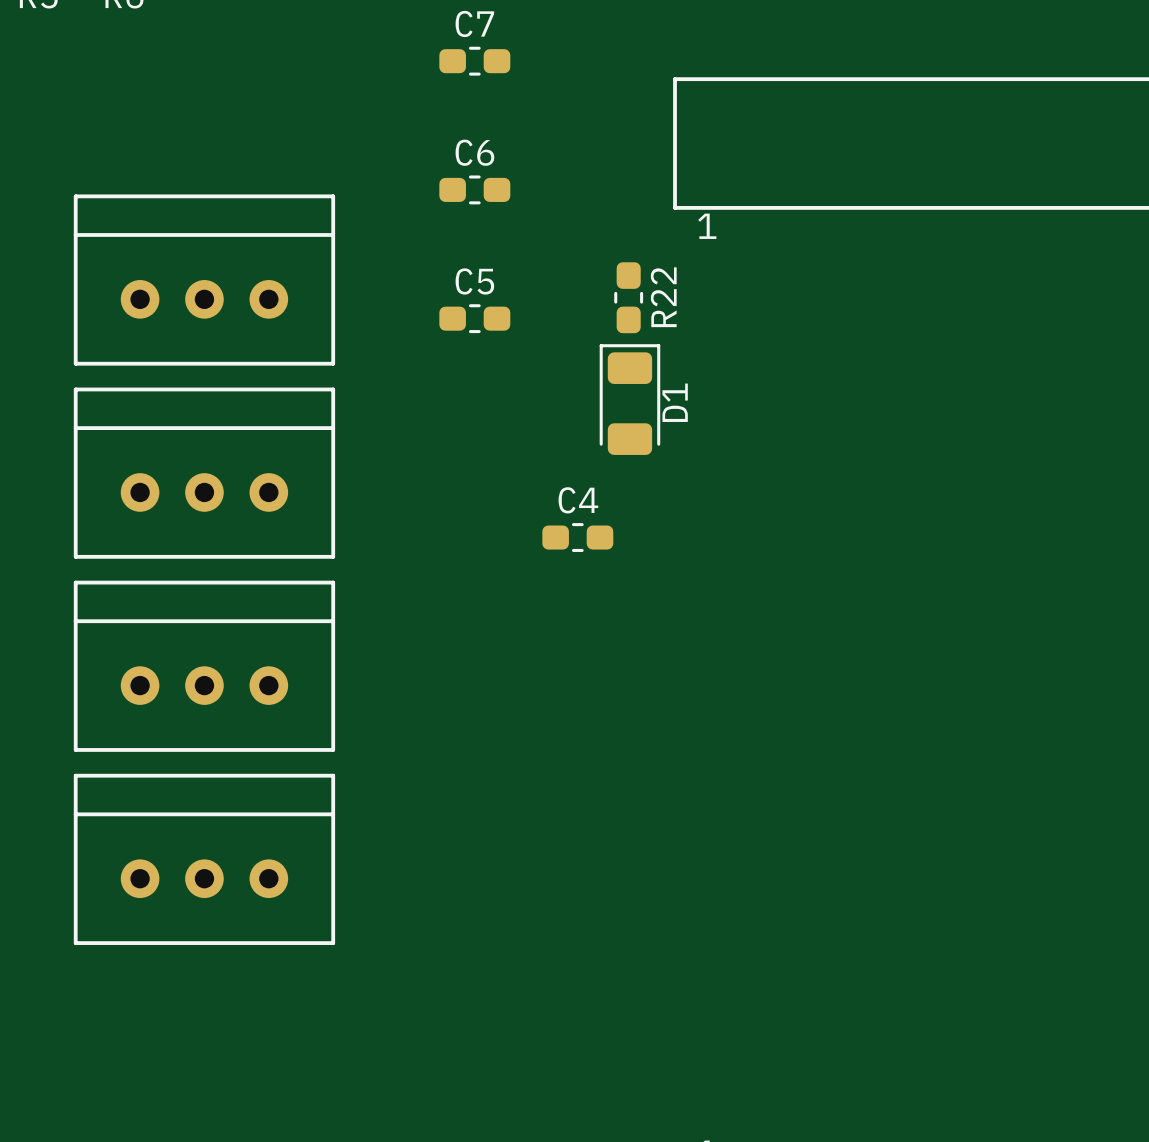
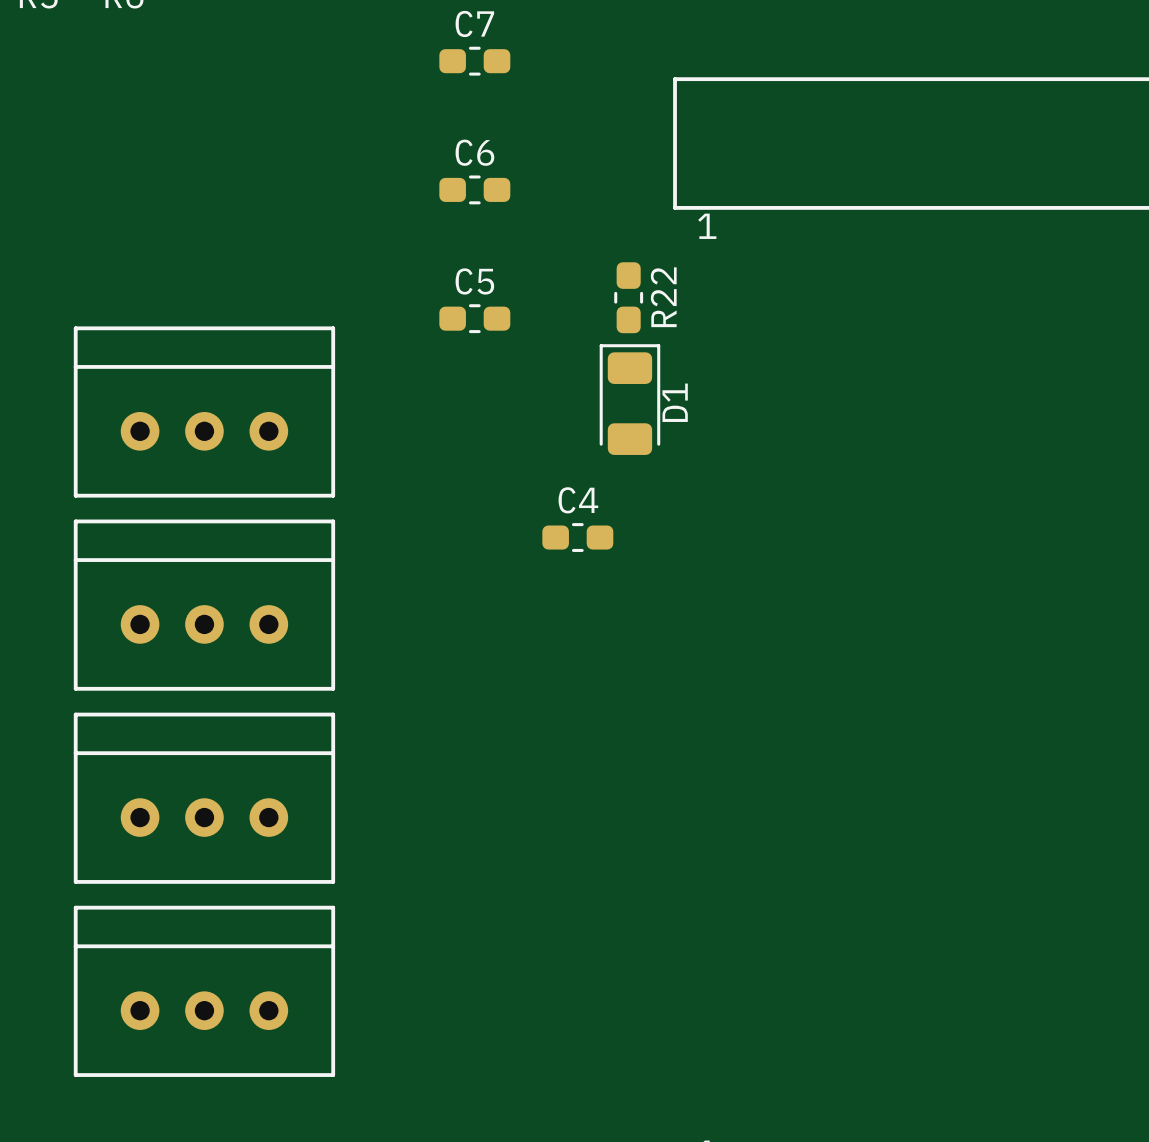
part: (204, 280) -> none
part position: (204, 473) -> (204, 412)
part position: (204, 666) -> (204, 605)
part position: (204, 859) -> (204, 798)
part: none -> (204, 991)

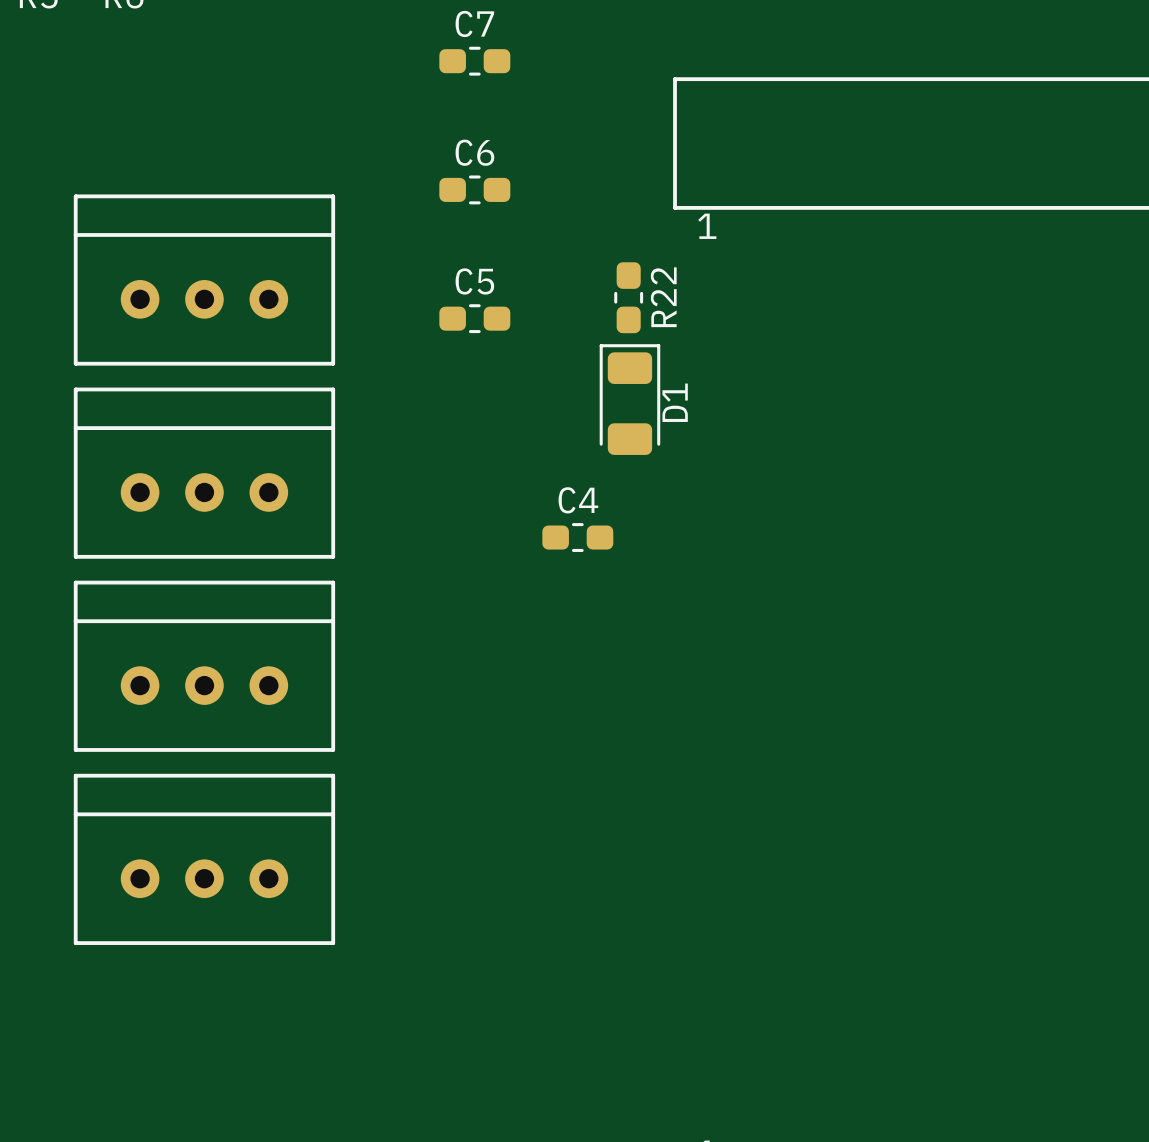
part: none -> (204, 280)
part position: (204, 412) -> (204, 473)
part position: (204, 605) -> (204, 666)
part position: (204, 798) -> (204, 859)
part: (204, 991) -> none

